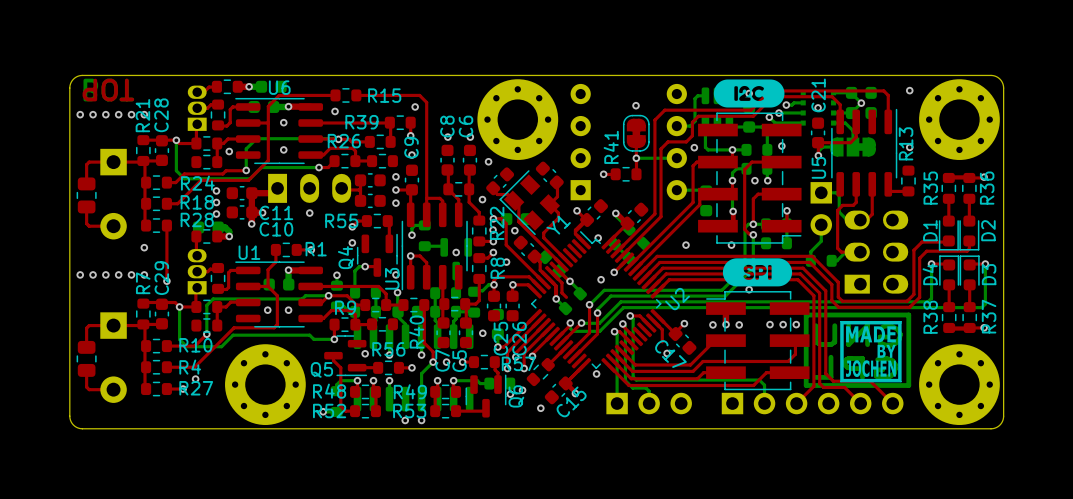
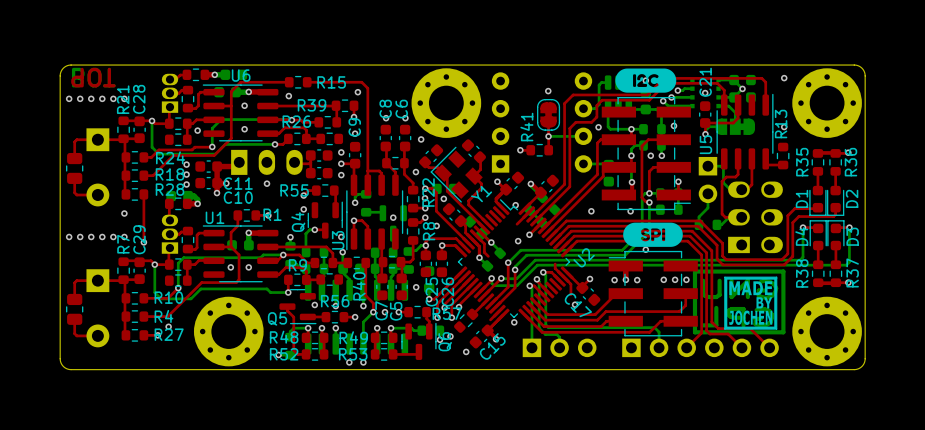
top track: none -> (528, 212) (517, 224)
top track: none -> (555, 264) (555, 268) (563, 276)
top track: none -> (499, 311) (490, 319)

